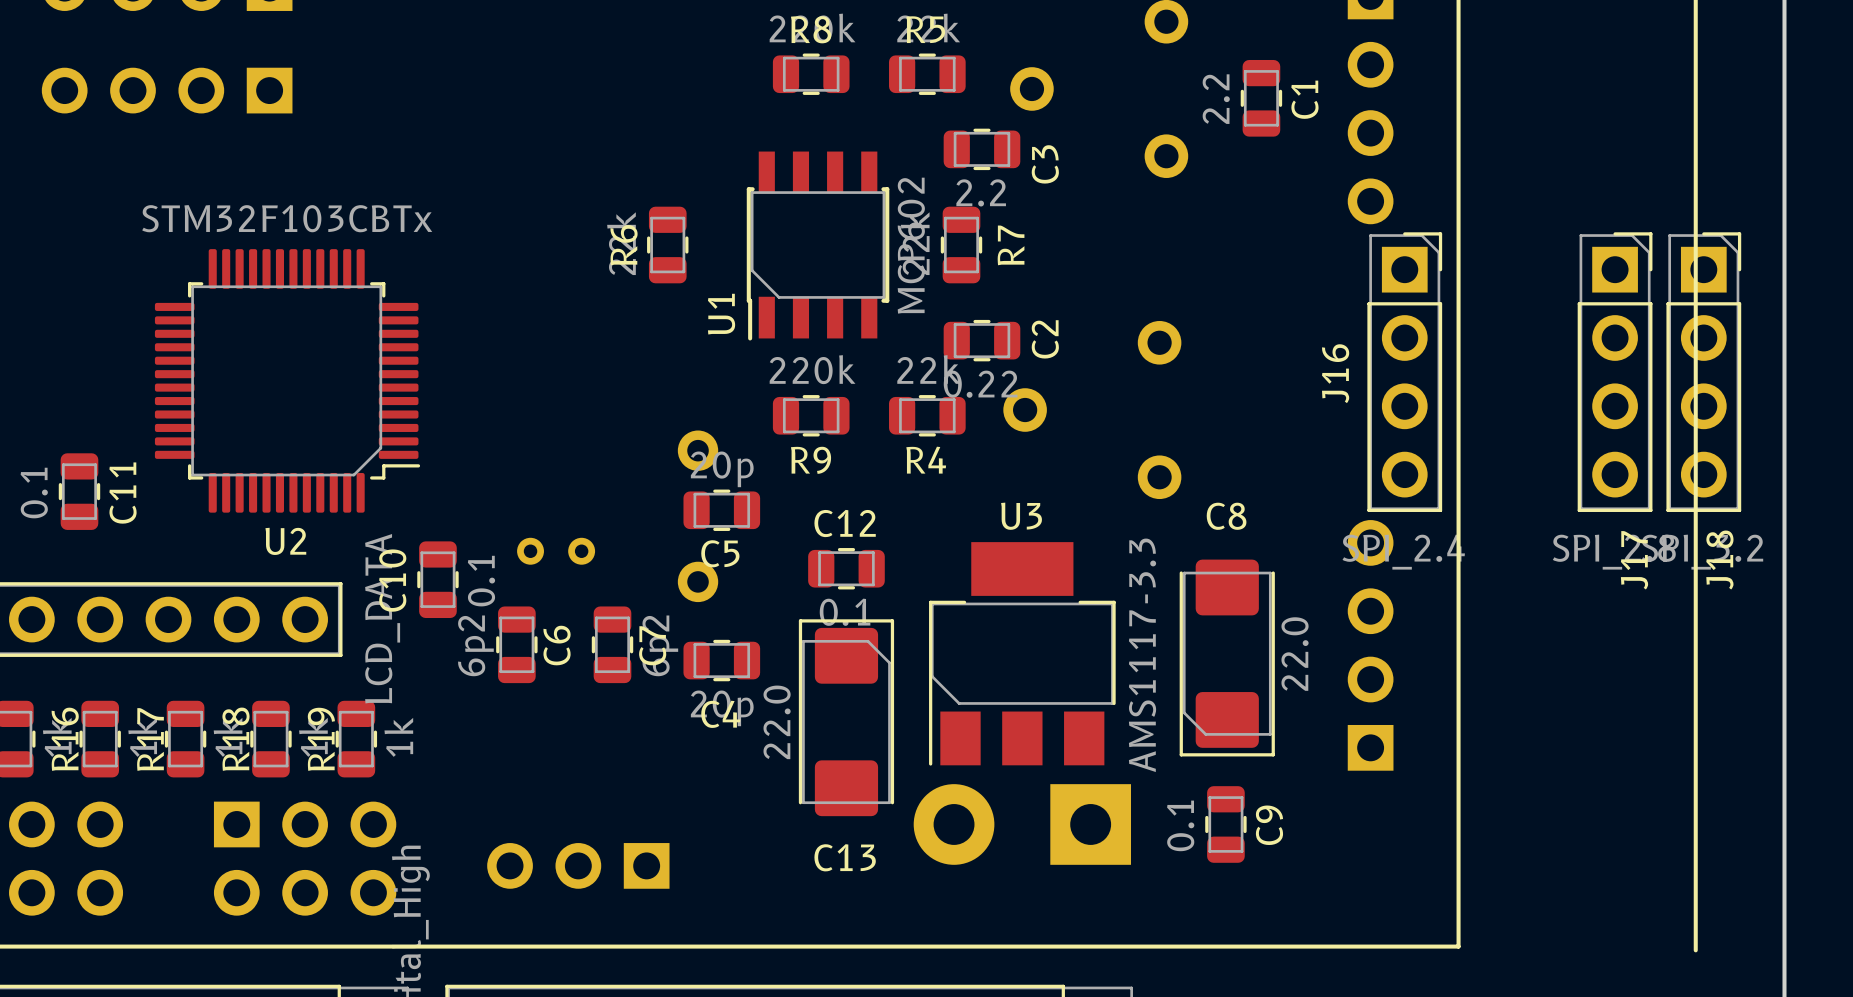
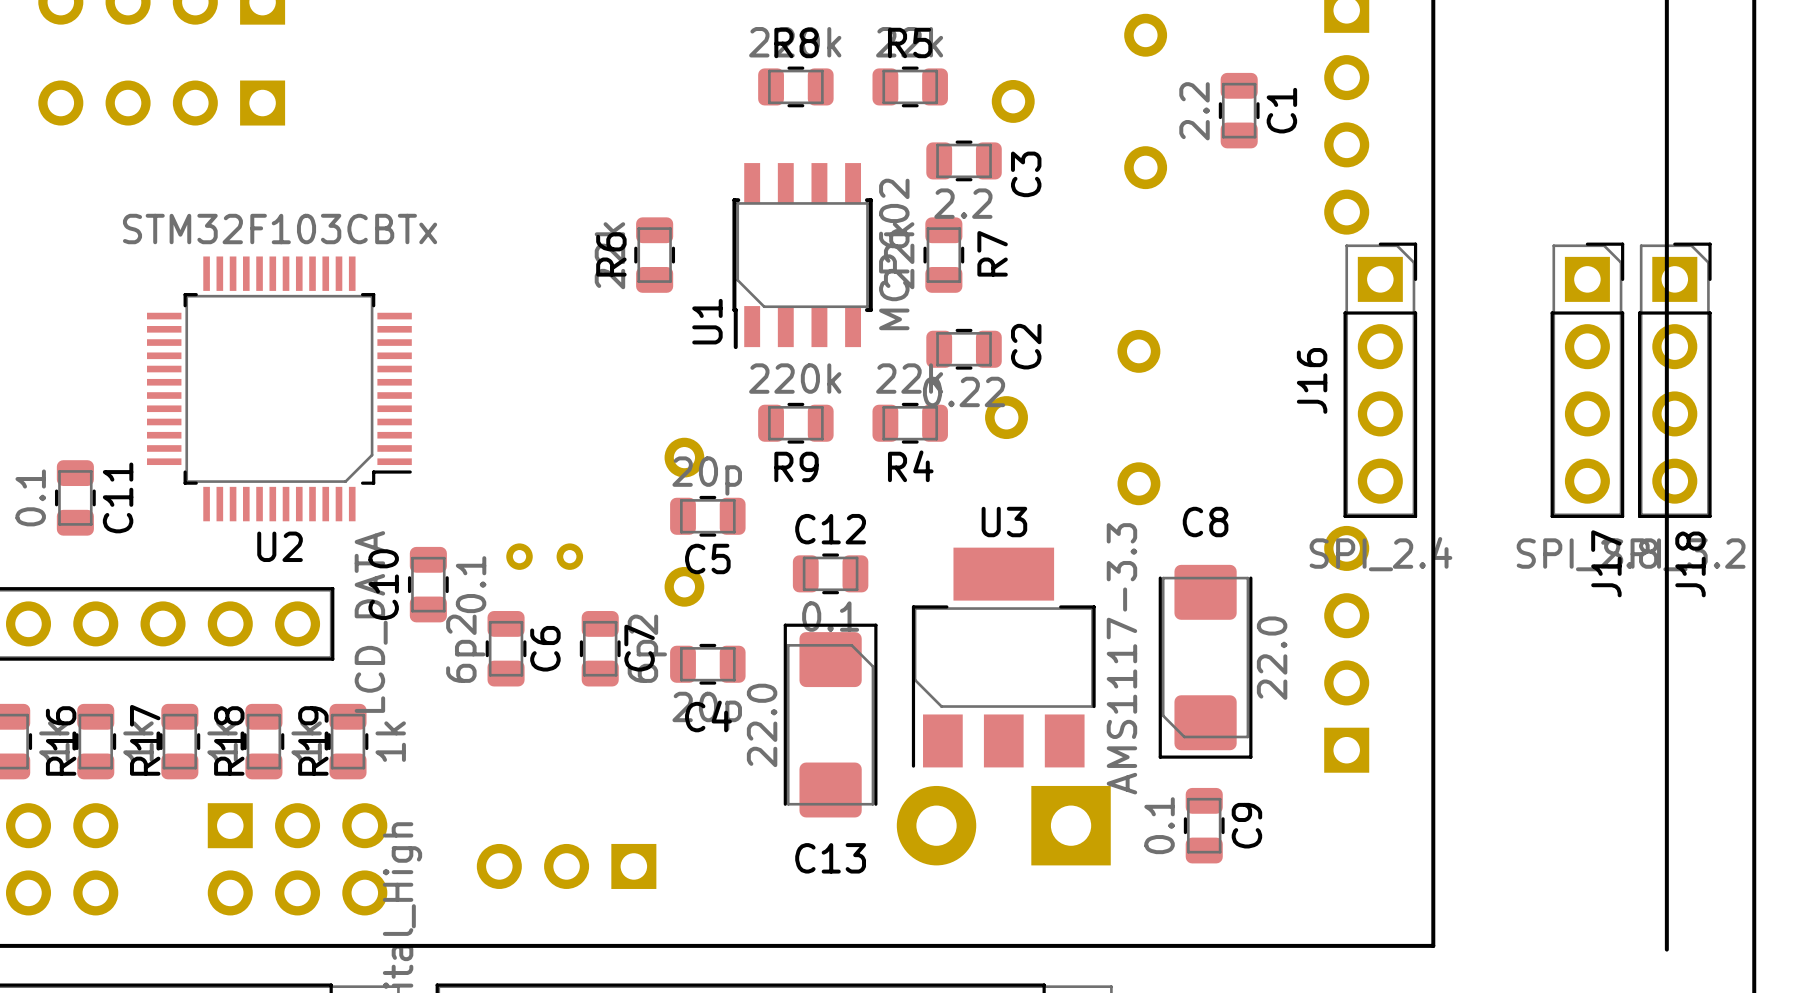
U2 footprint: [154, 249, 421, 513] -> [147, 256, 412, 522]

